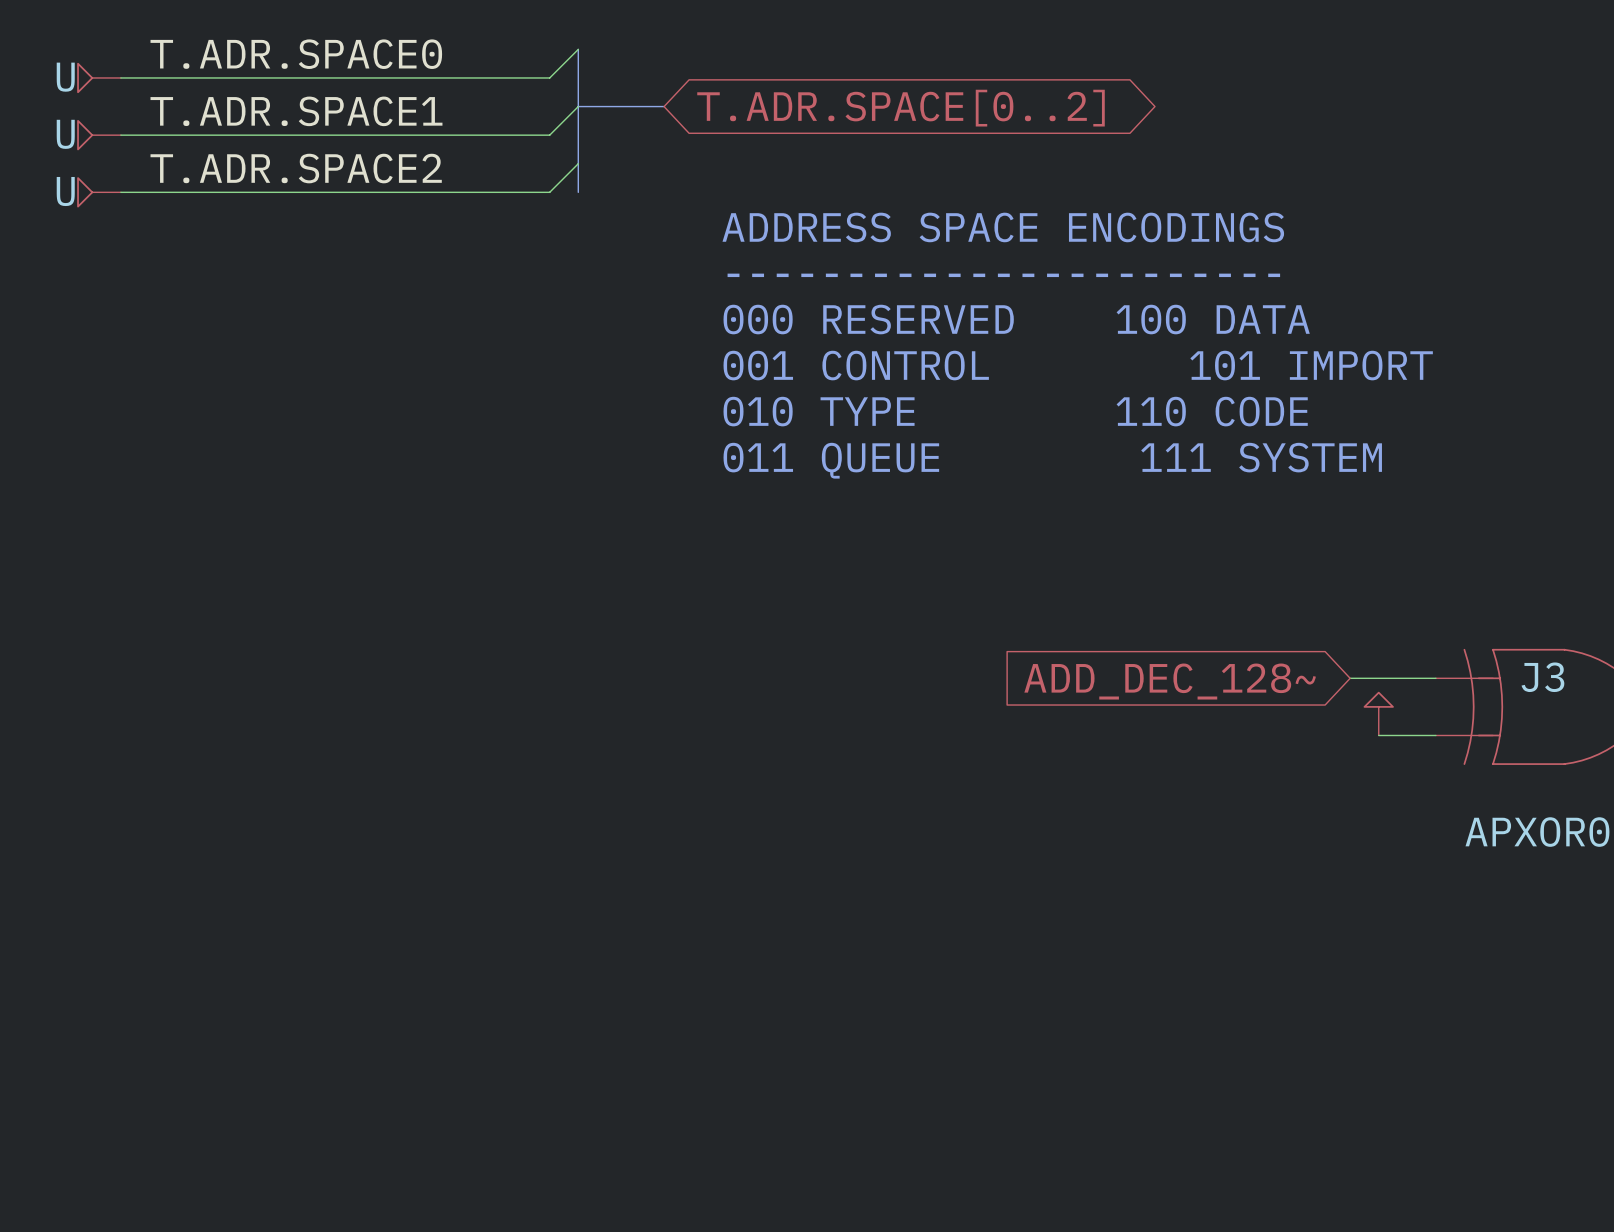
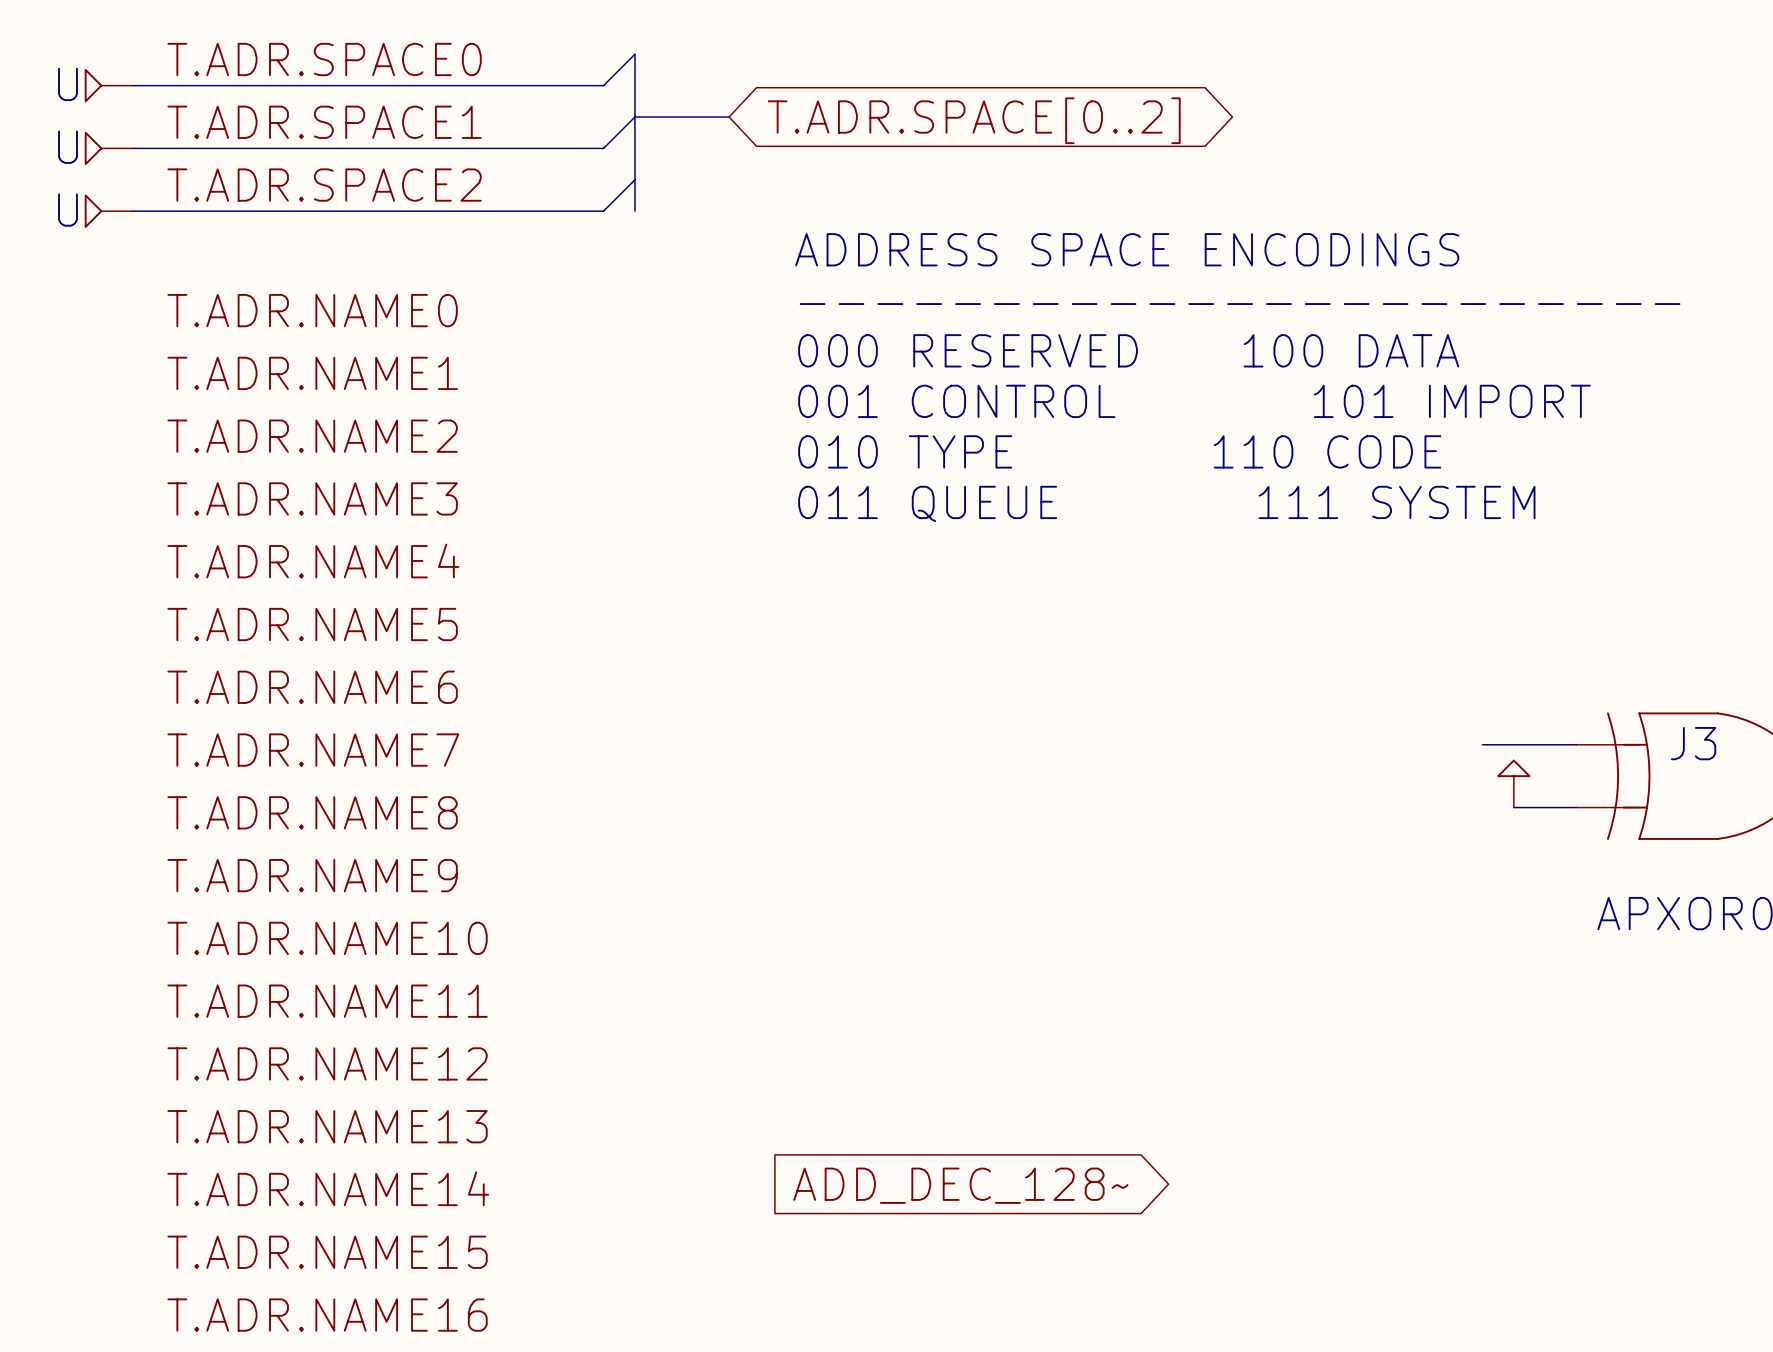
label: none -> T.ADR.NAME0 (312, 310)
label: none -> T.ADR.NAME1 (312, 373)
label: none -> T.ADR.NAME2 (312, 436)
label: none -> T.ADR.NAME3 (312, 498)
label: none -> T.ADR.NAME4 (313, 560)
label: none -> T.ADR.NAME5 (312, 624)
label: none -> T.ADR.NAME6 (312, 687)
global label: ADD_DEC_128~ (1170, 681) -> none
label: none -> T.ADR.NAME7 (313, 750)
label: none -> T.ADR.NAME8 (312, 812)
label: none -> T.ADR.NAME9 (312, 875)
label: none -> T.ADR.NAME10 (327, 938)
label: none -> T.ADR.NAME11 (327, 1001)
label: none -> T.ADR.NAME12 (327, 1063)
label: none -> T.ADR.NAME13 (327, 1126)
global label: none -> ADD_DEC_128~ (960, 1185)
label: none -> T.ADR.NAME14 (328, 1188)
label: none -> T.ADR.NAME15 (327, 1252)
label: none -> T.ADR.NAME16 (327, 1315)

